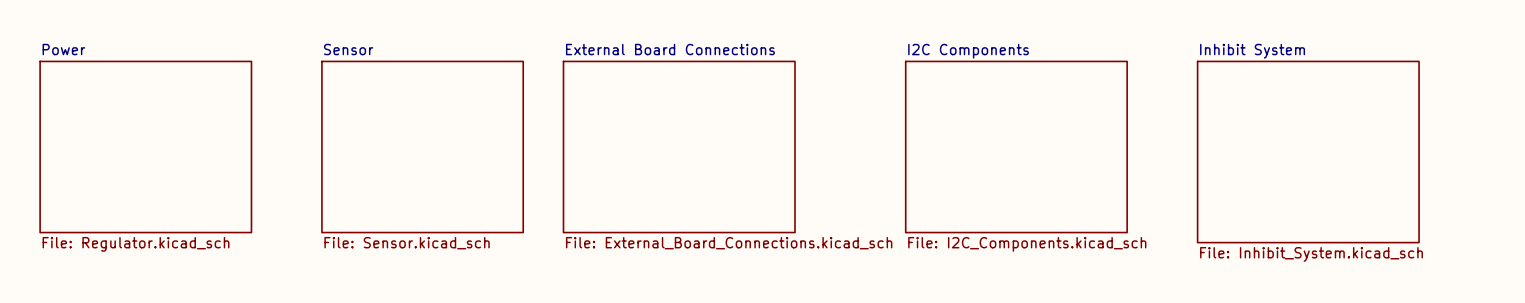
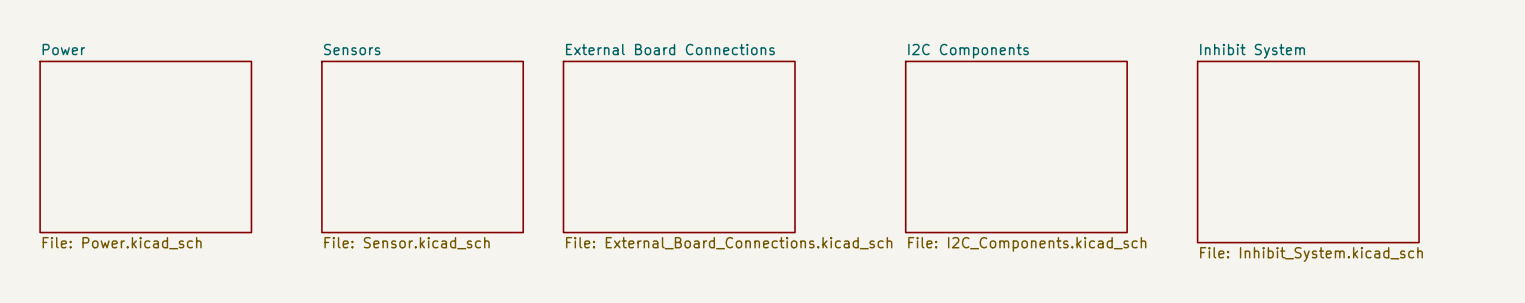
sheet Sensor name: Sensor (348, 49) -> Sensors (352, 49)
sheet Power value: File: Regulator.kicad_sch (136, 244) -> File: Power.kicad_sch (122, 243)

